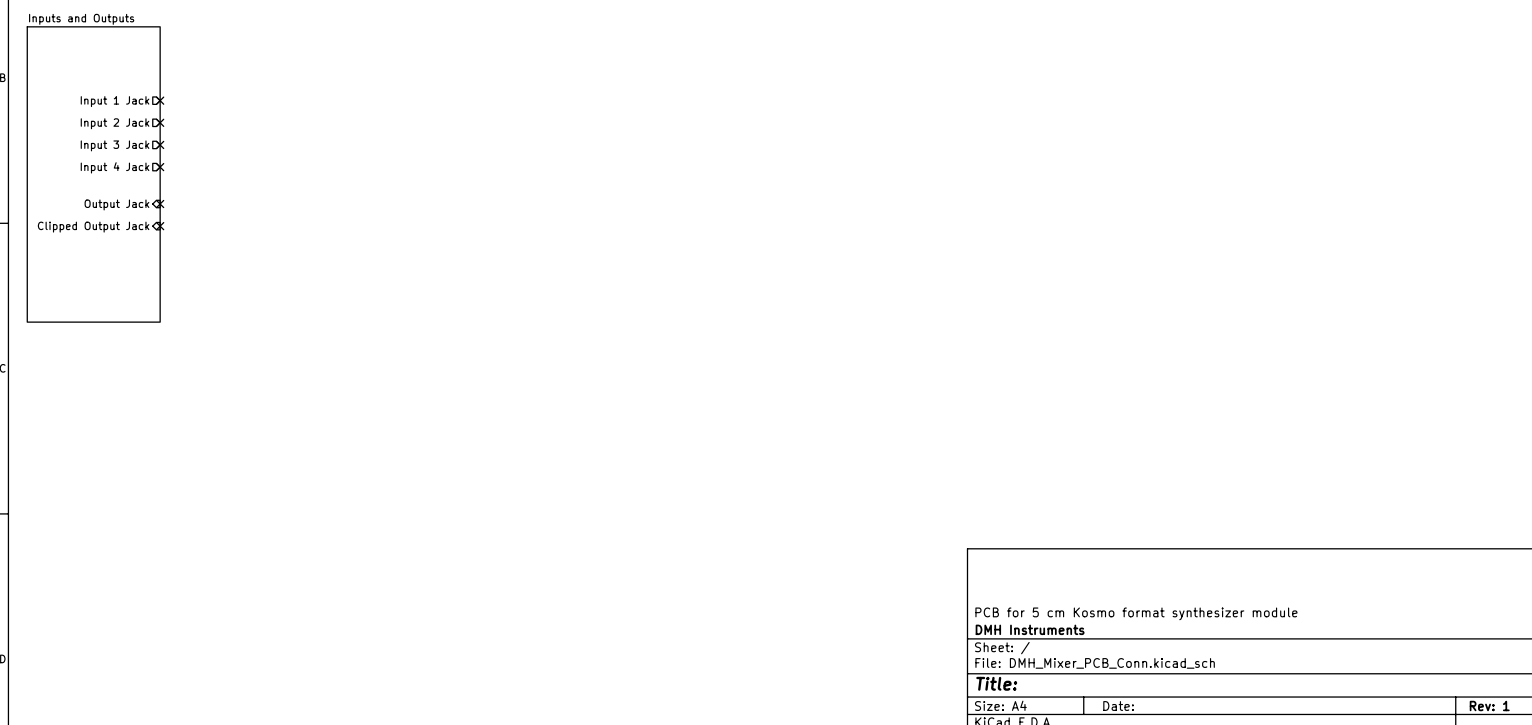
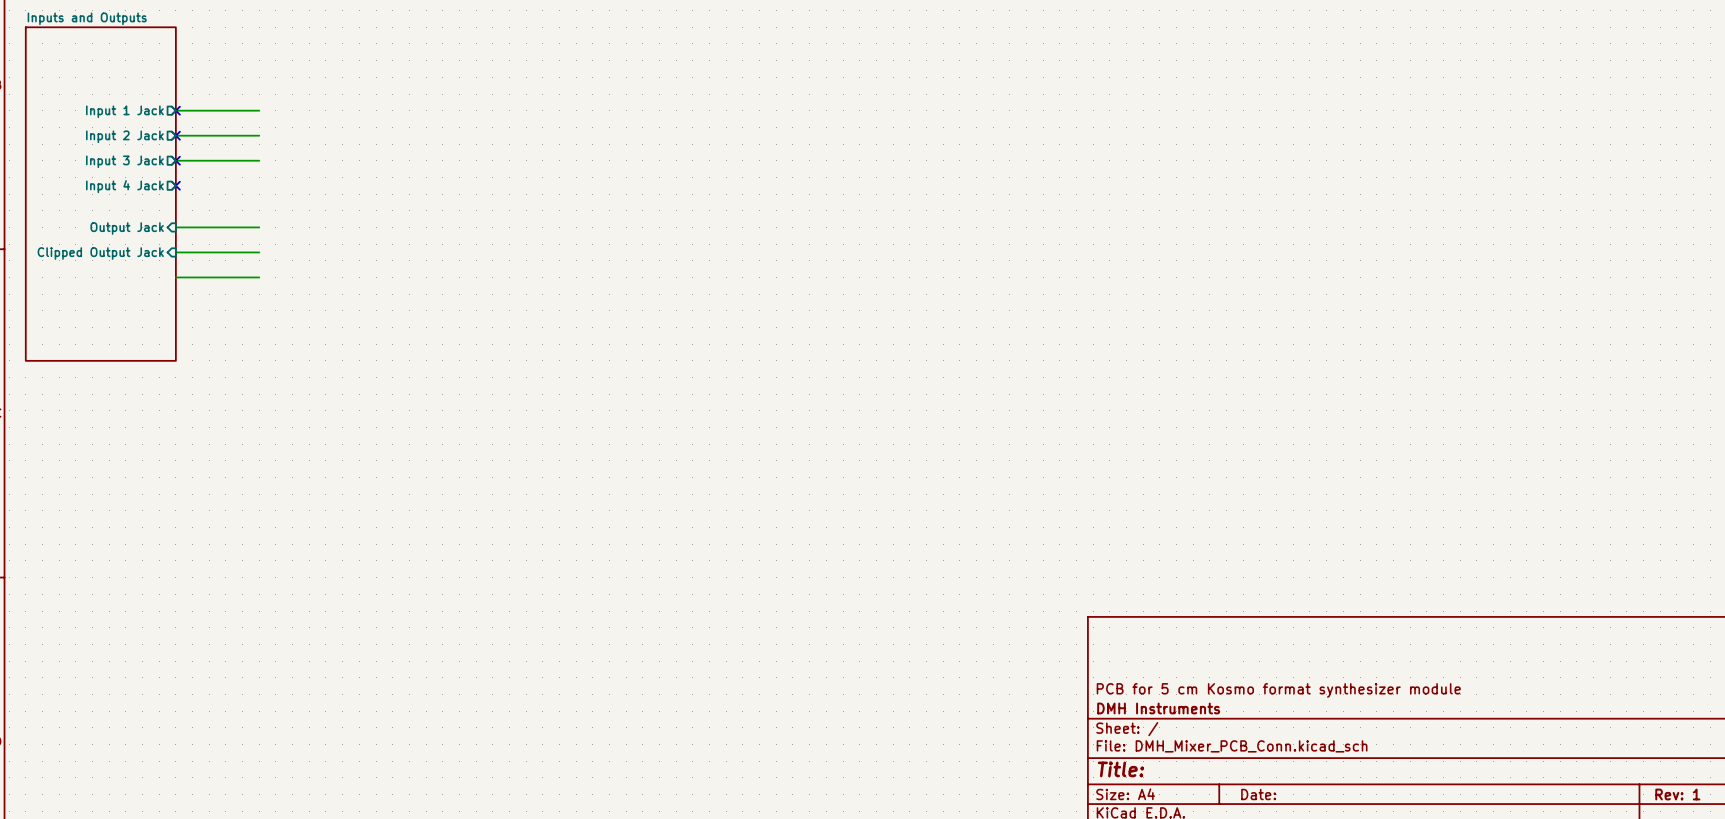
wire: none -> (175, 110) (259, 110)
wire: none -> (175, 135) (259, 135)
wire: none -> (175, 160) (259, 160)
wire: none -> (175, 227) (259, 227)
no-connect mark: (160, 204) -> none
wire: none -> (175, 252) (259, 252)
no-connect mark: (160, 226) -> none
wire: none -> (175, 277) (259, 277)

